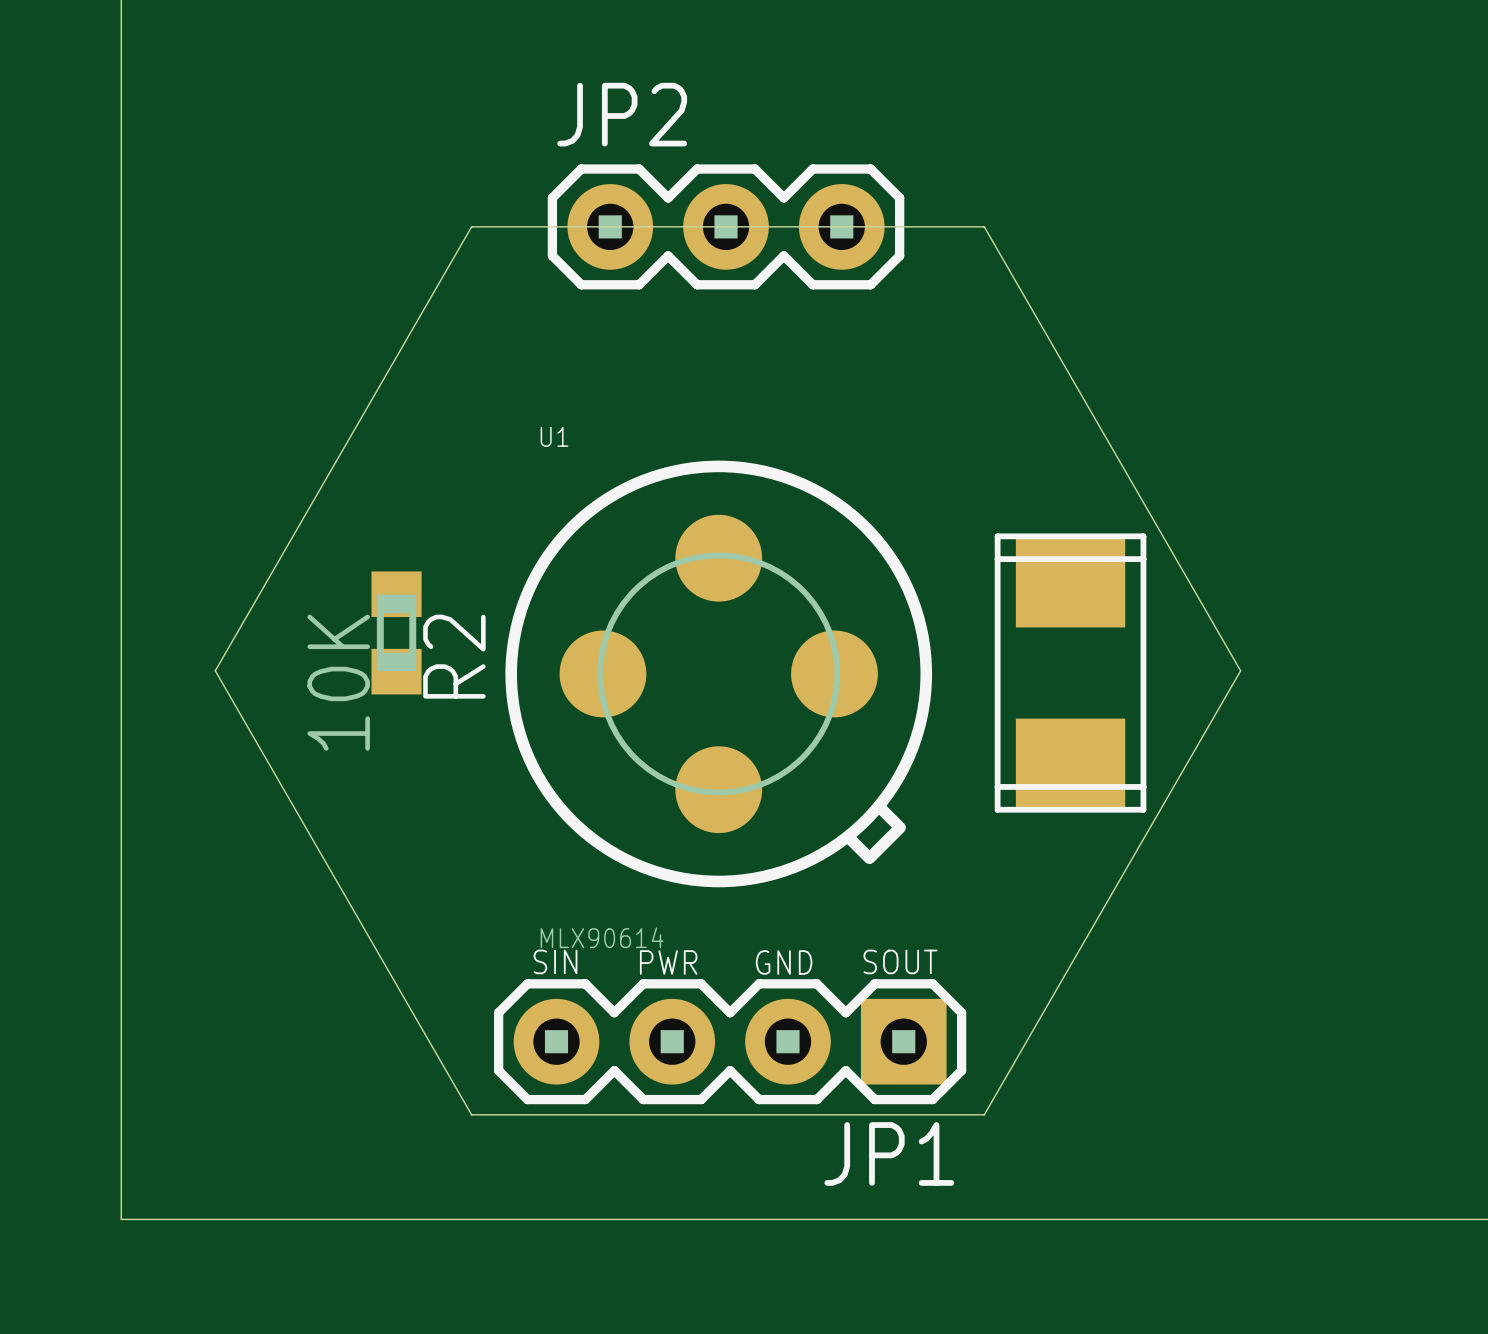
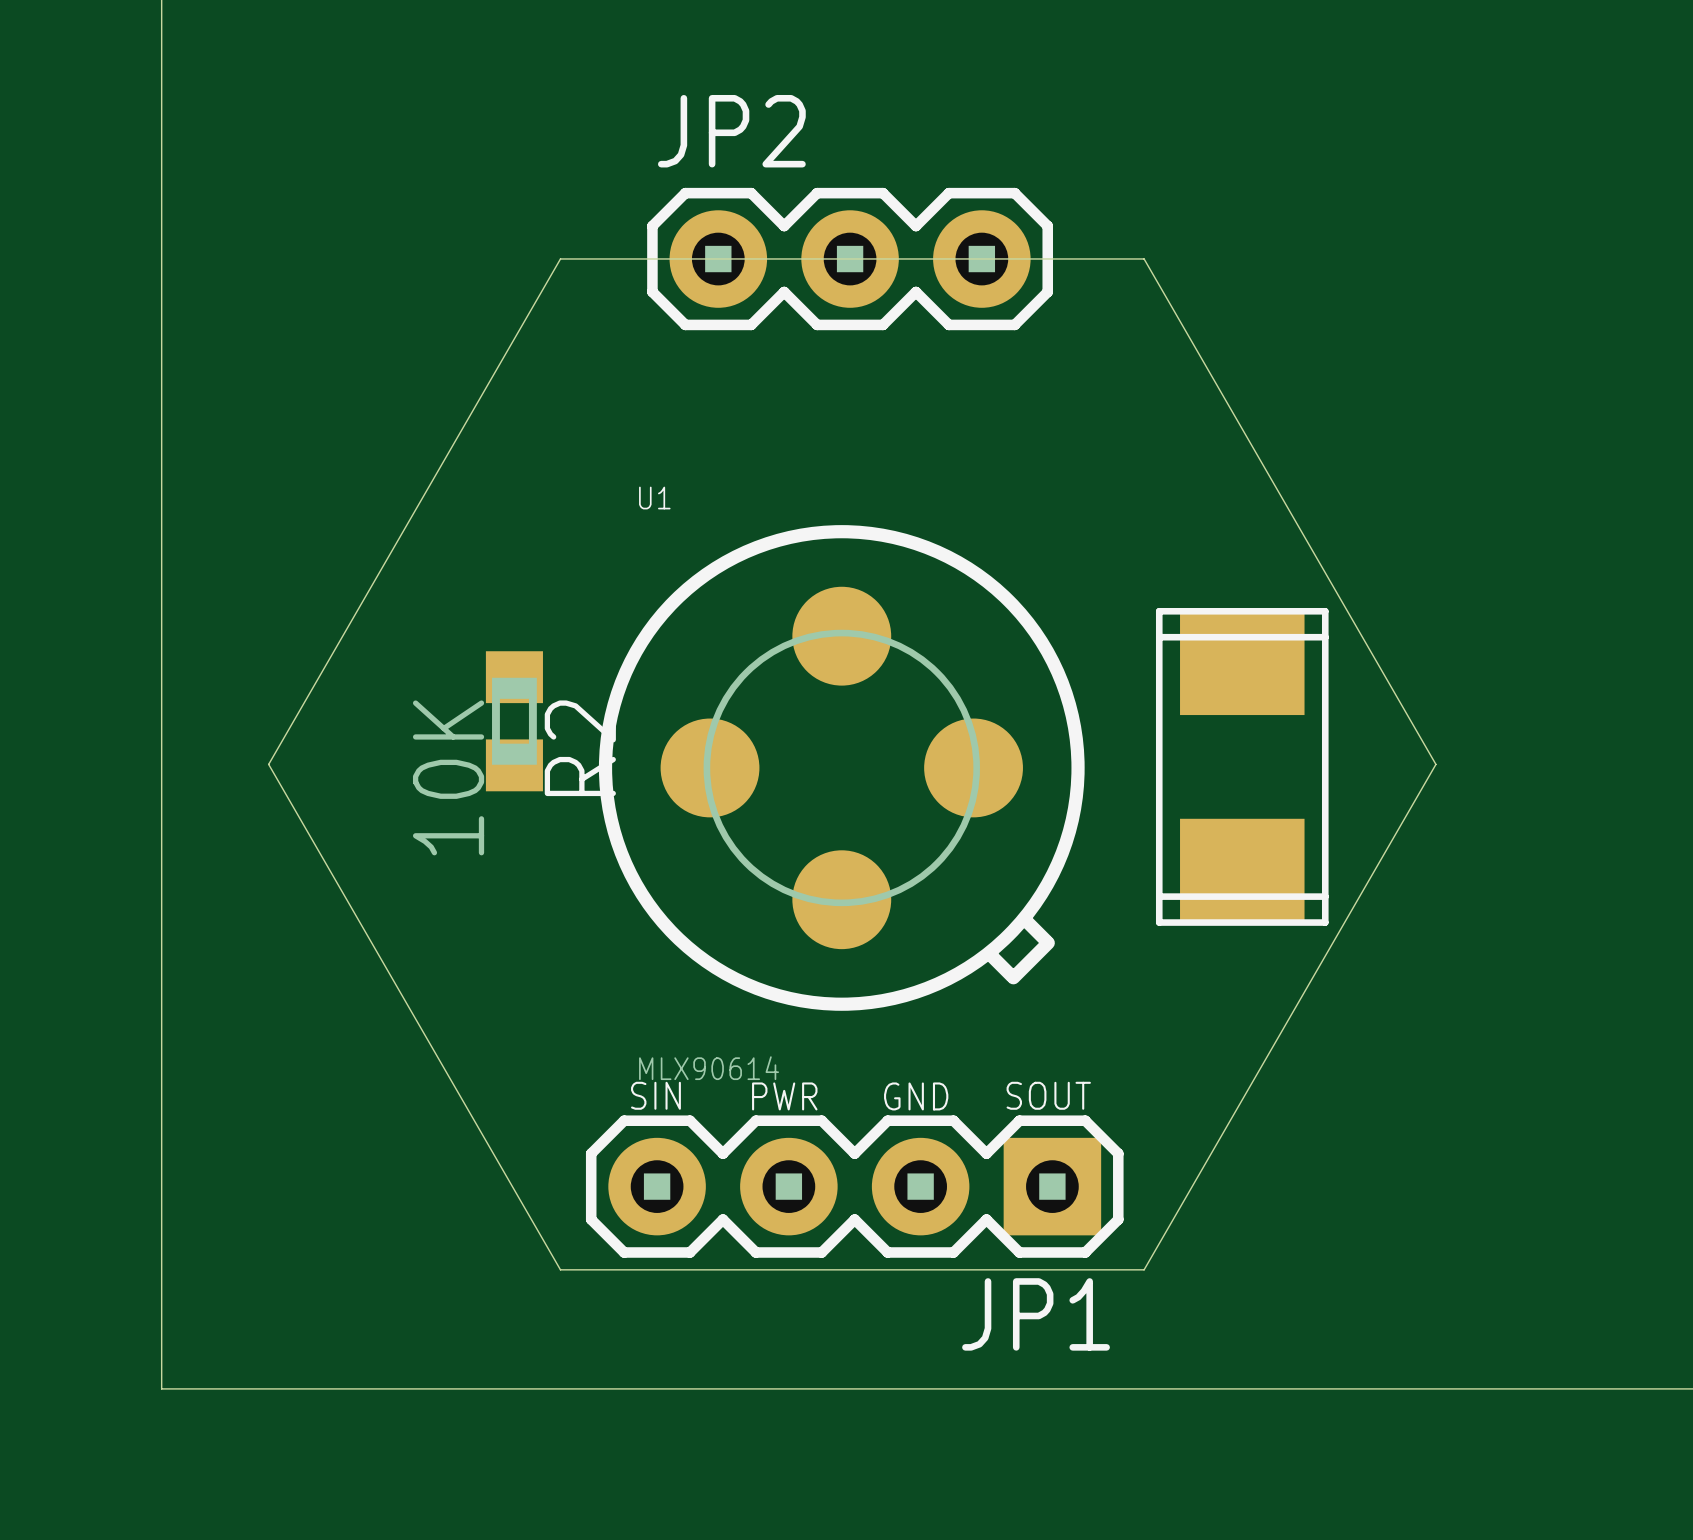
R2 position: (396, 632) -> (514, 721)

